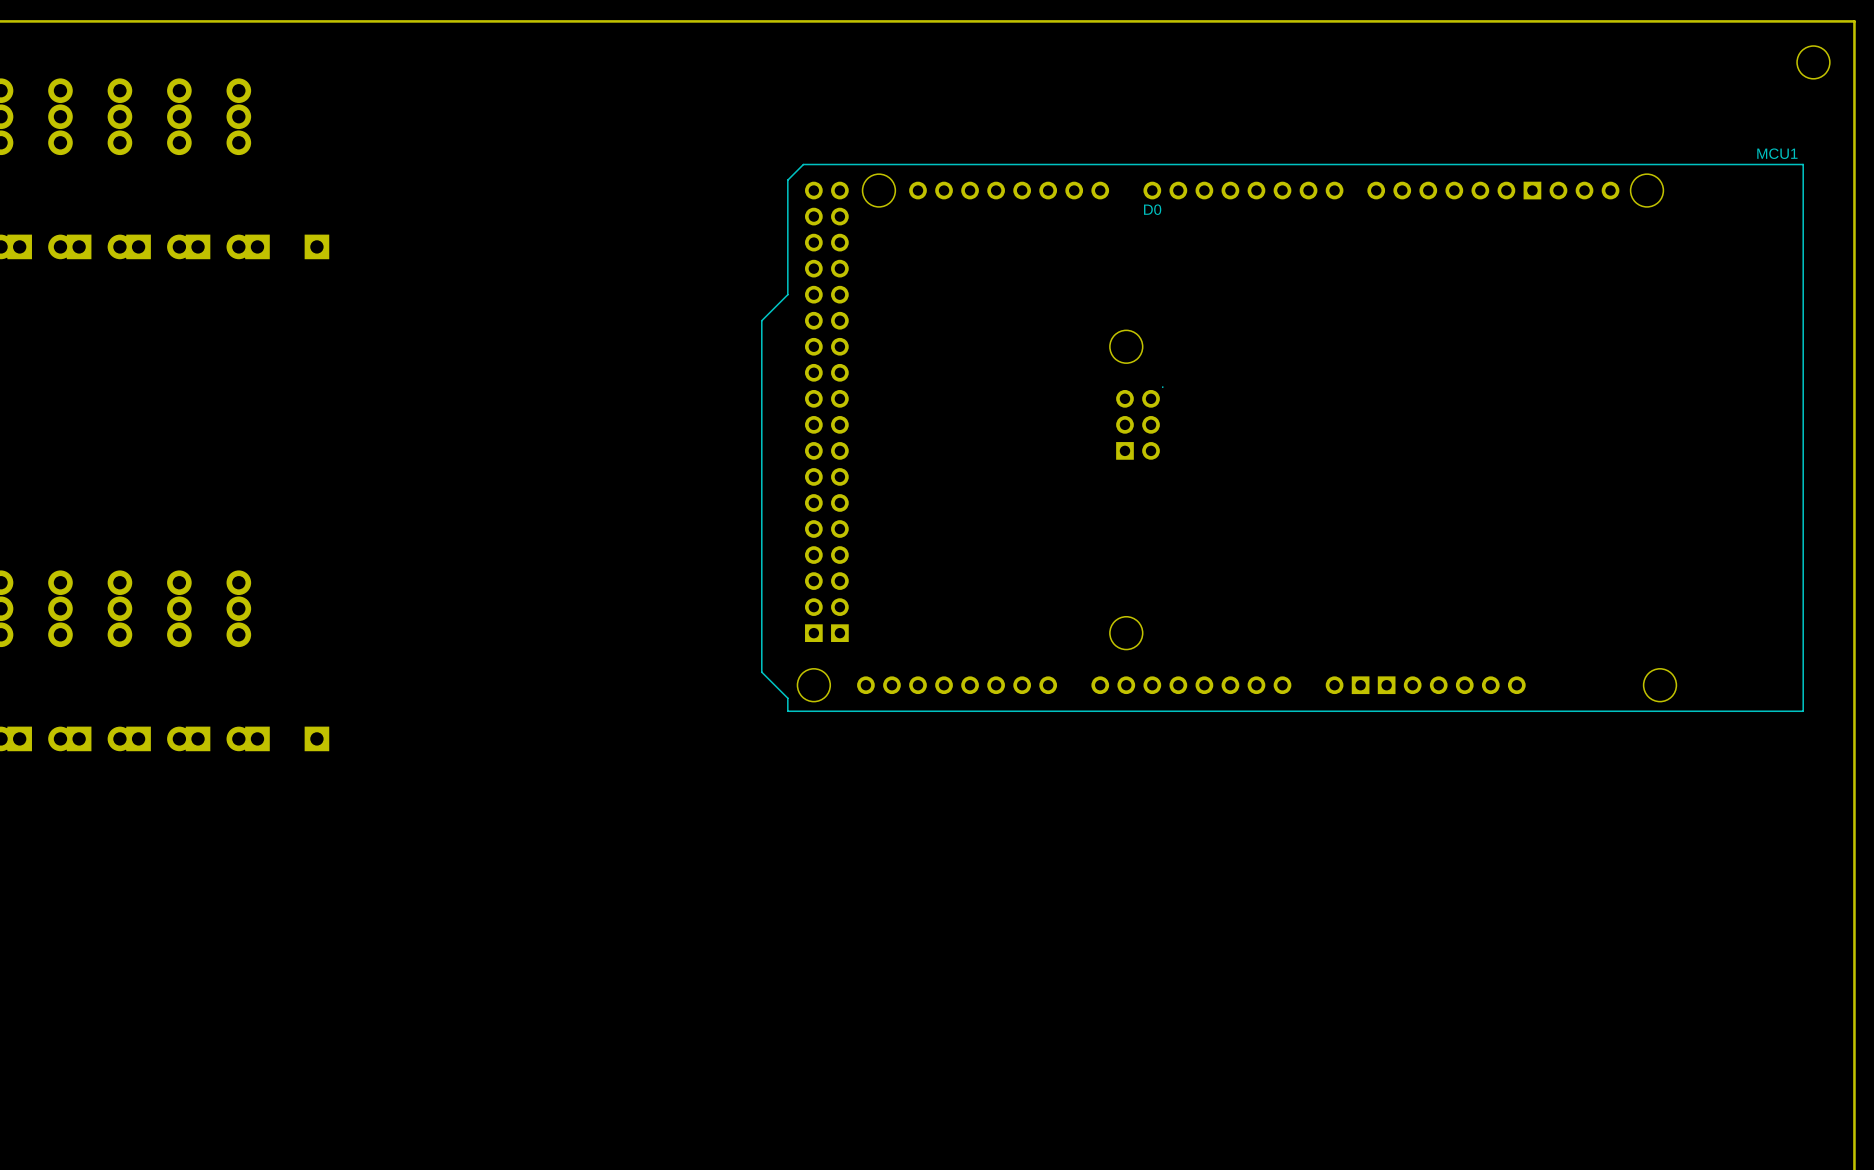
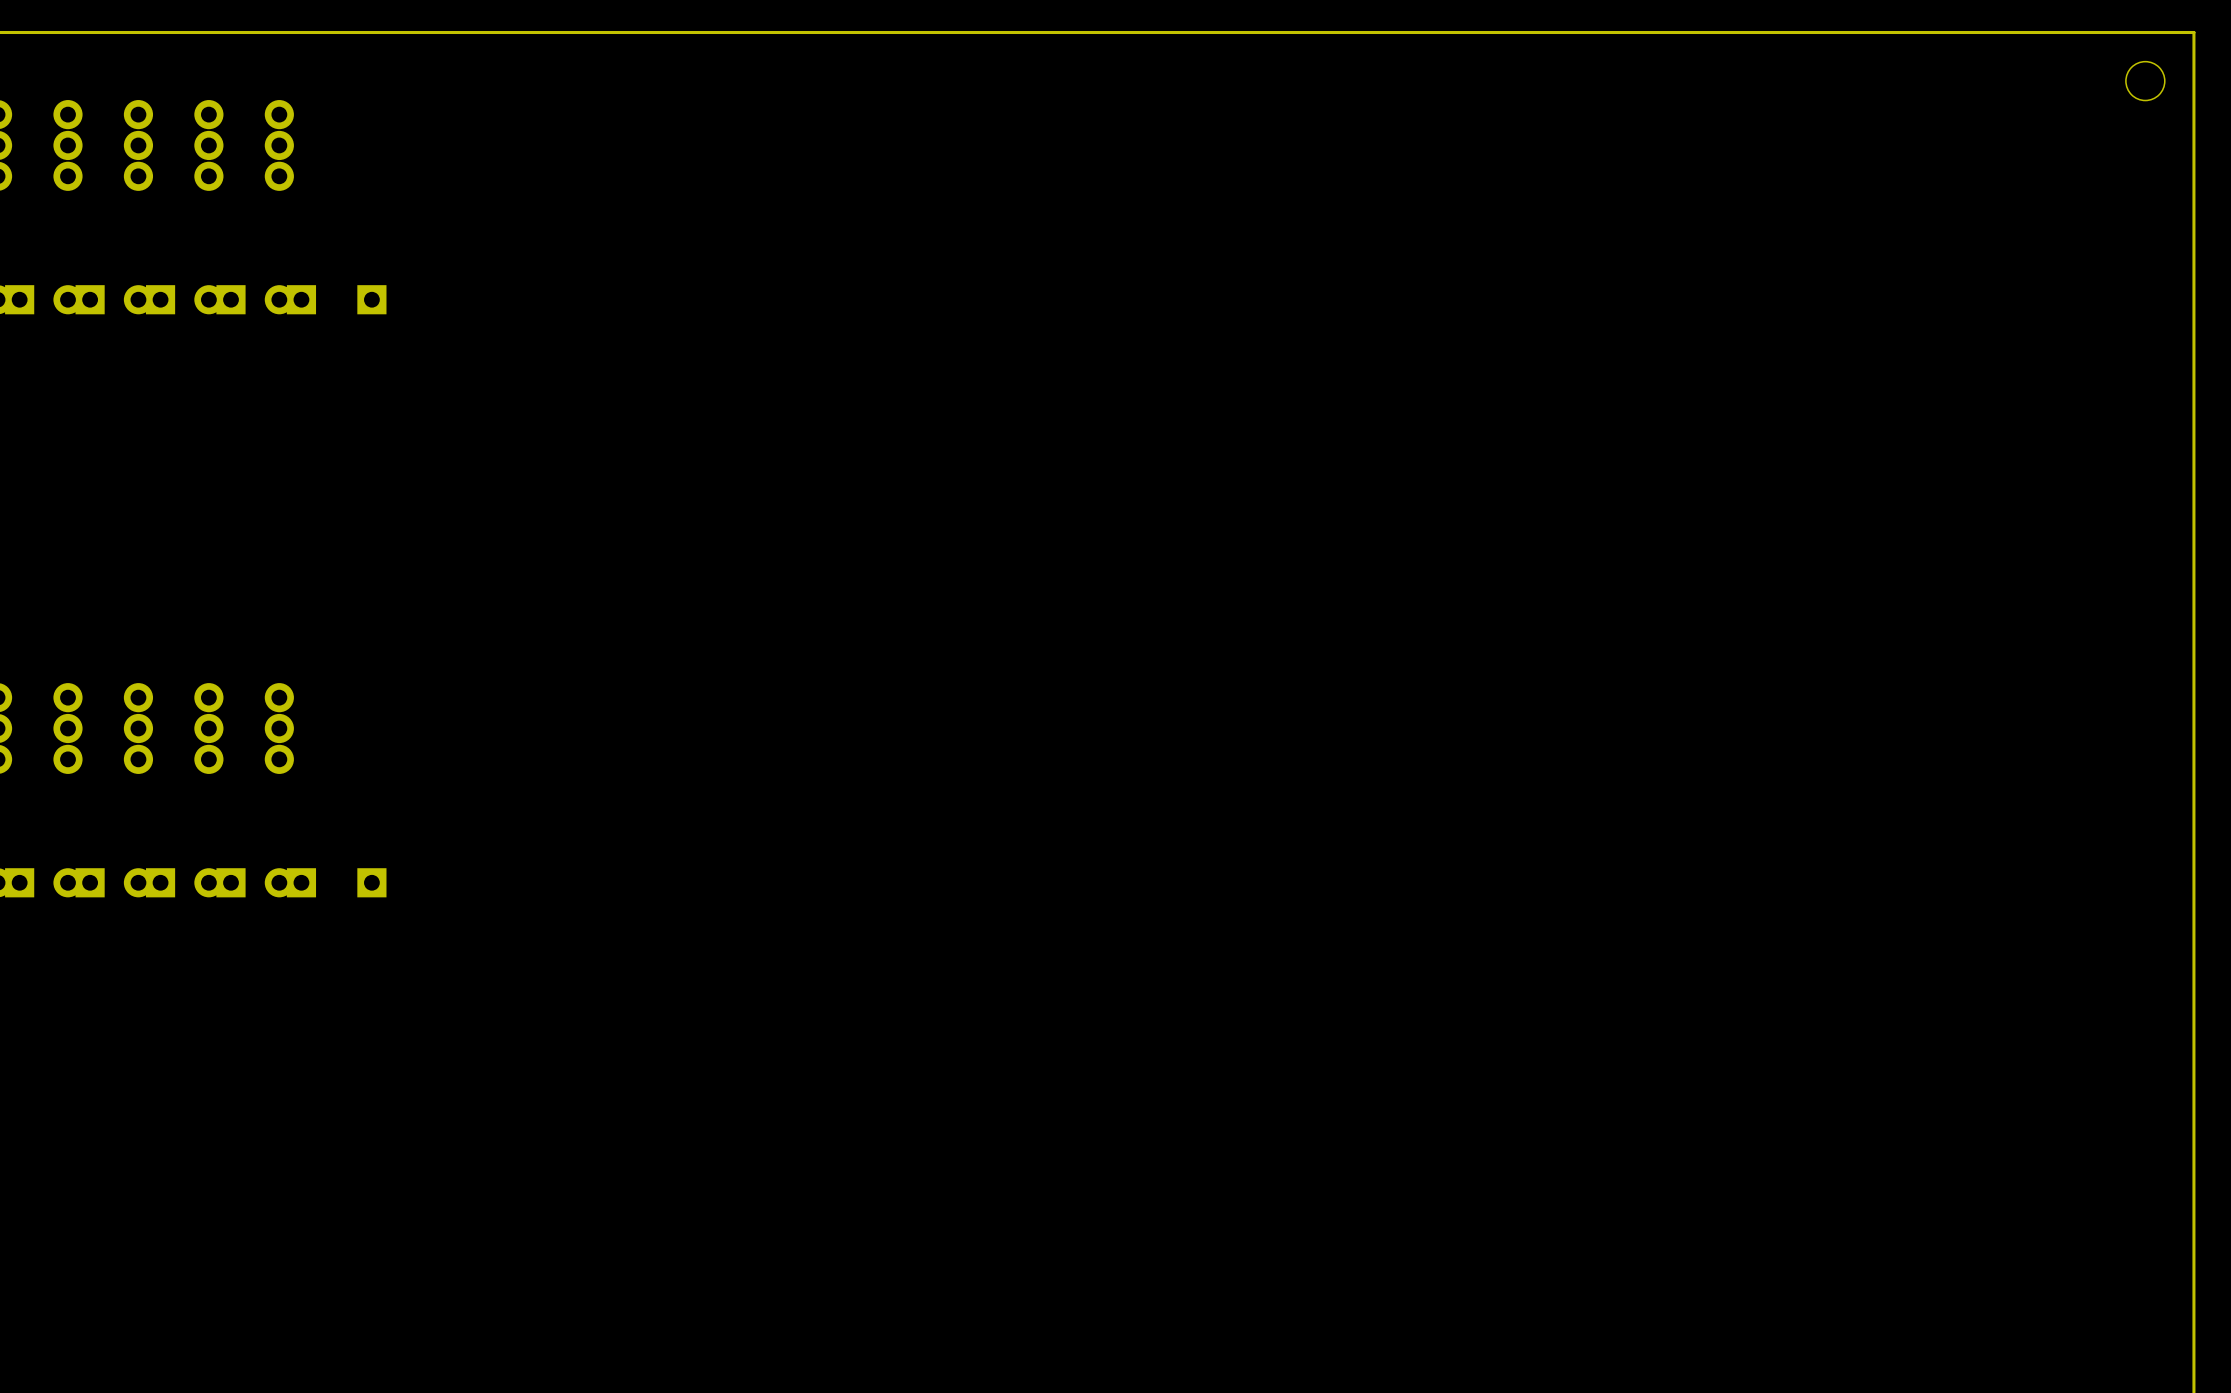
MCU1: (1282, 437) -> none

